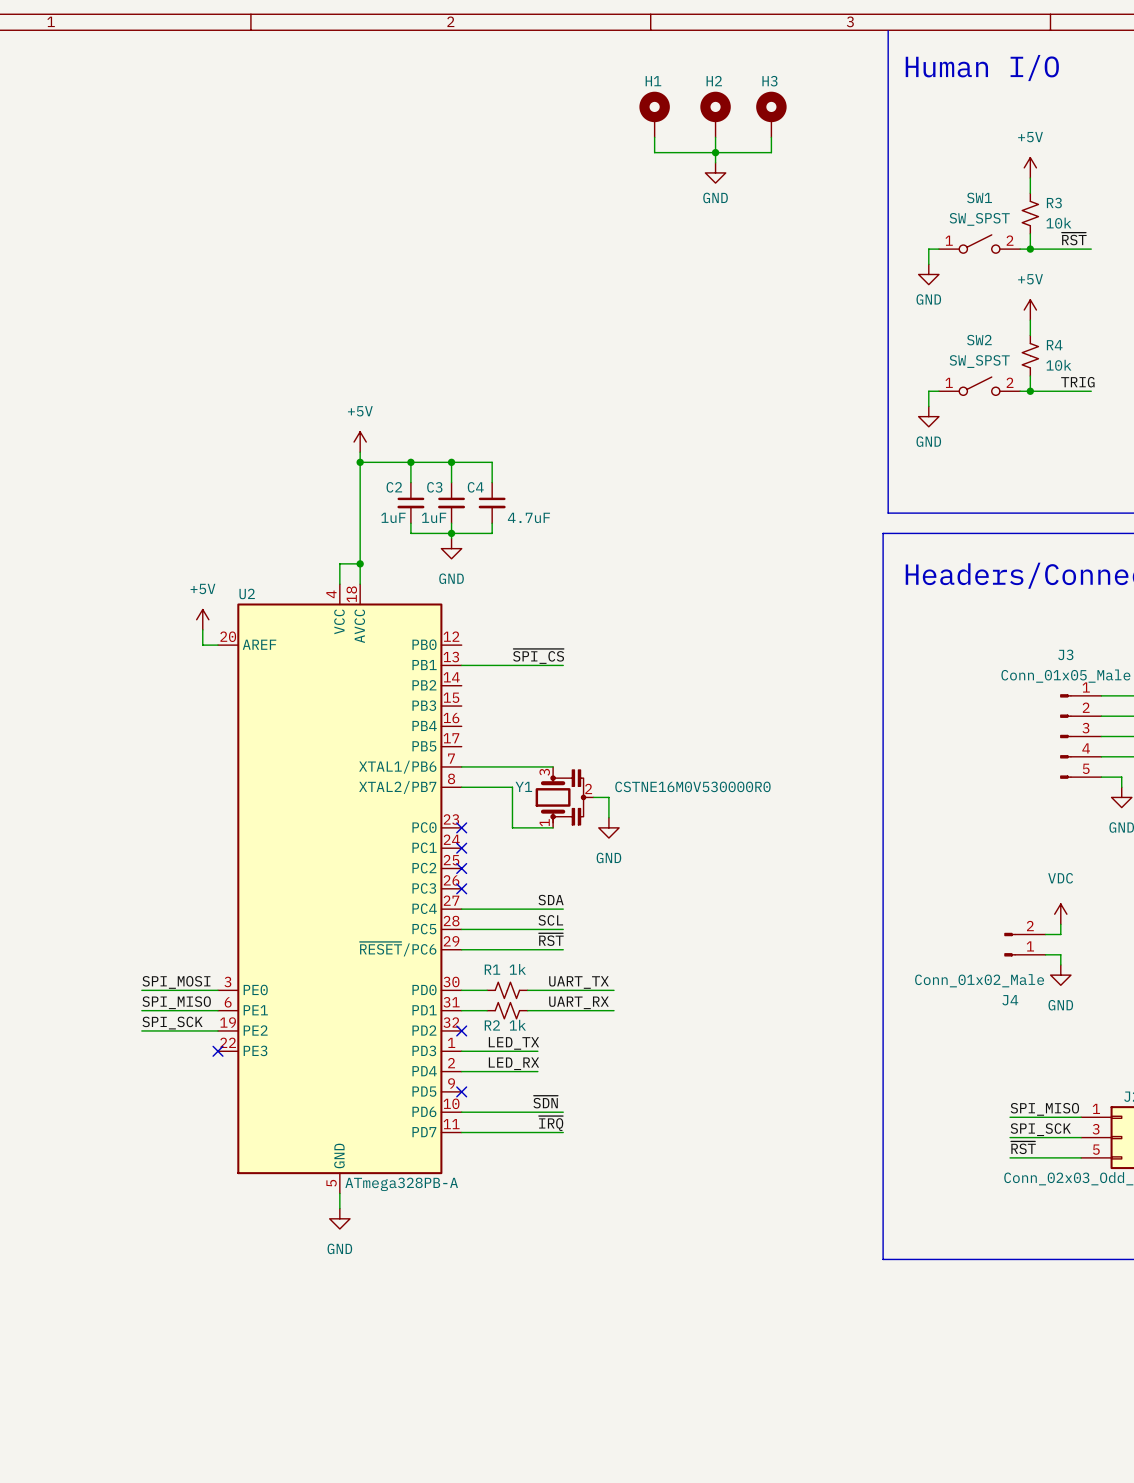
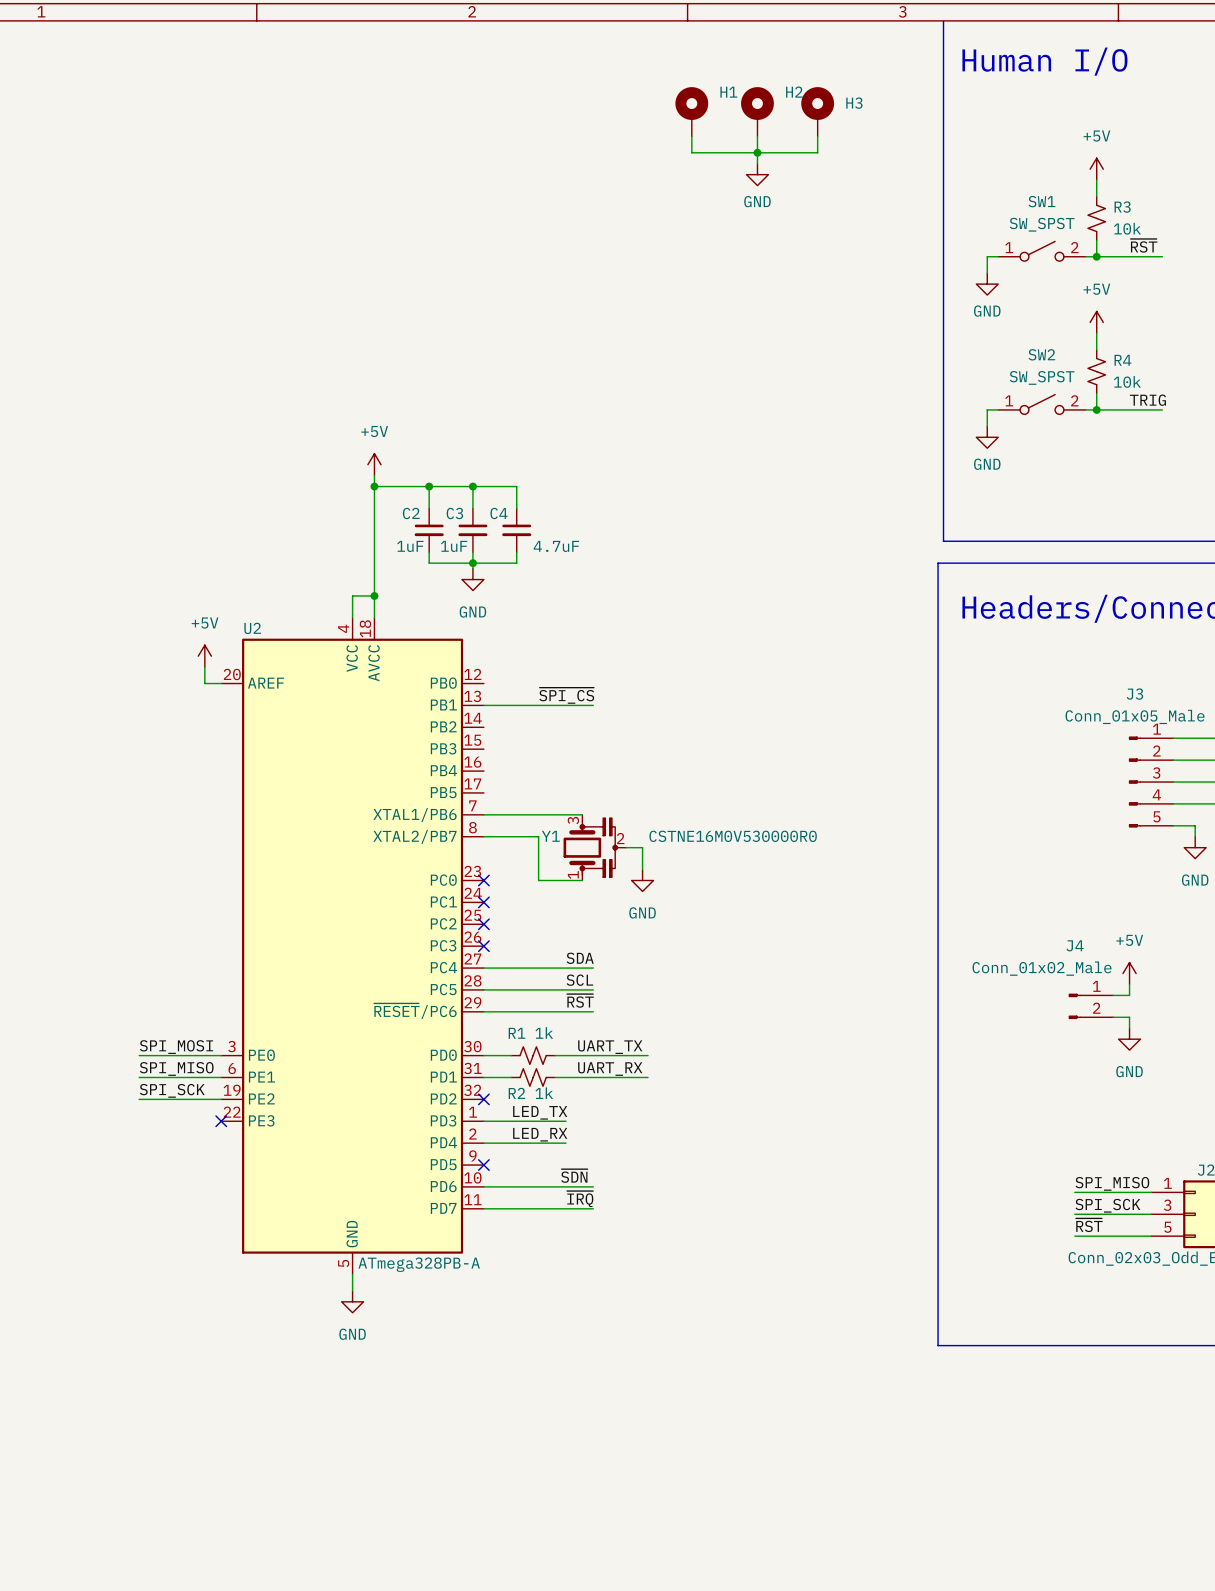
H1 name position: H1 (653, 81) -> H1 (728, 92)
H2 name position: H2 (714, 81) -> H2 (794, 92)
H3 name position: H3 (769, 81) -> H3 (854, 103)
power symbol: VDC (1060, 914) -> +5V (1129, 973)
J4 flip: as is (1010, 944) -> up-down (1074, 1006)

